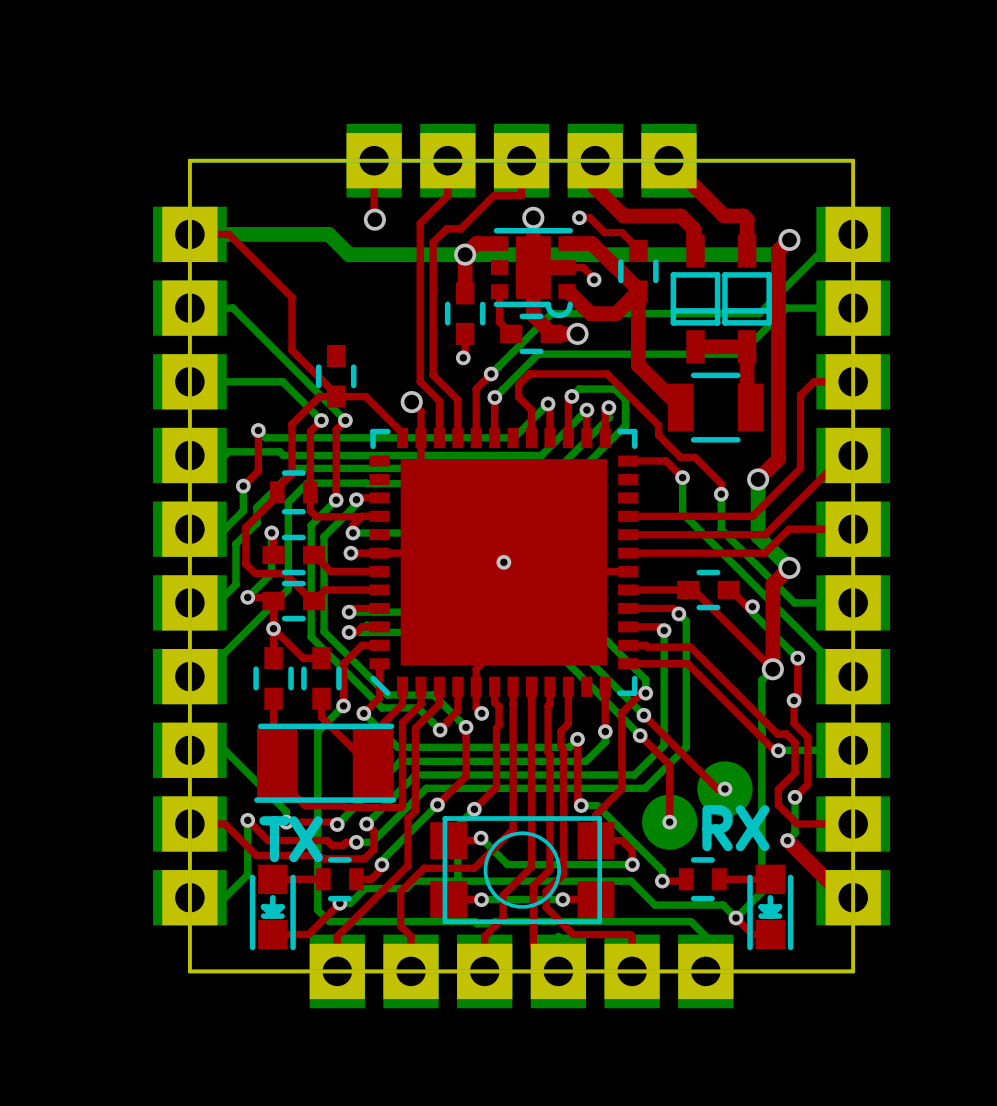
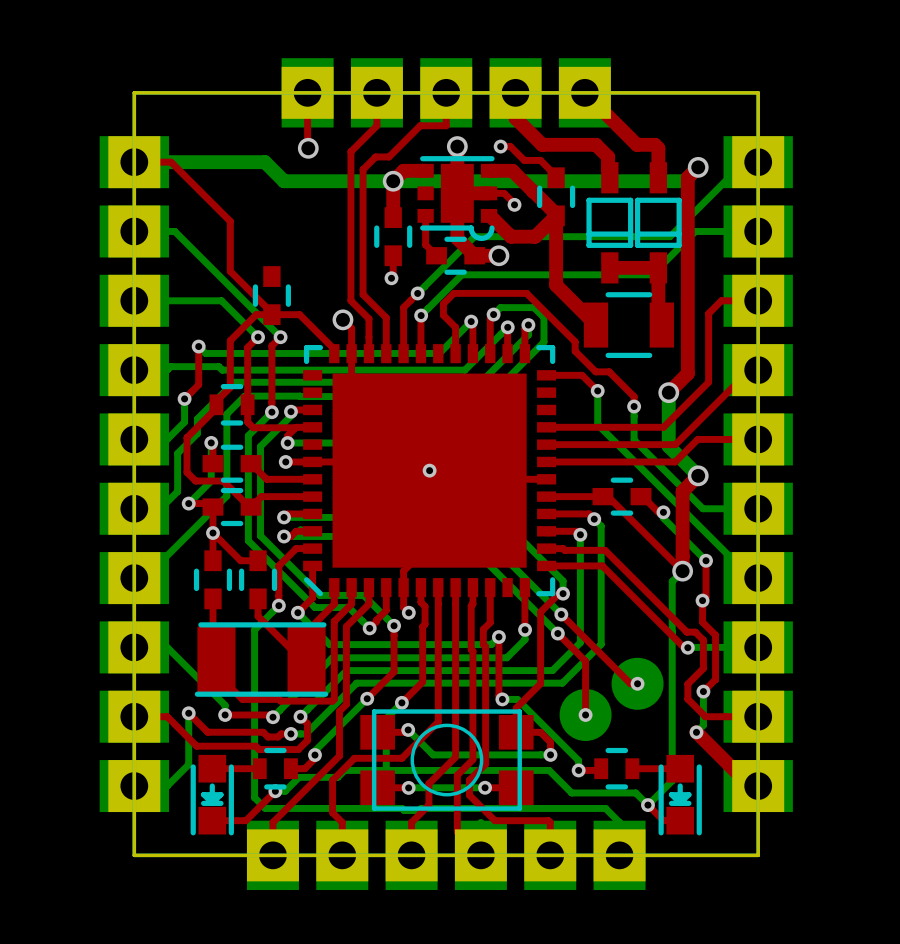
text: RX (735, 828) -> none
text: TX (291, 839) -> none

